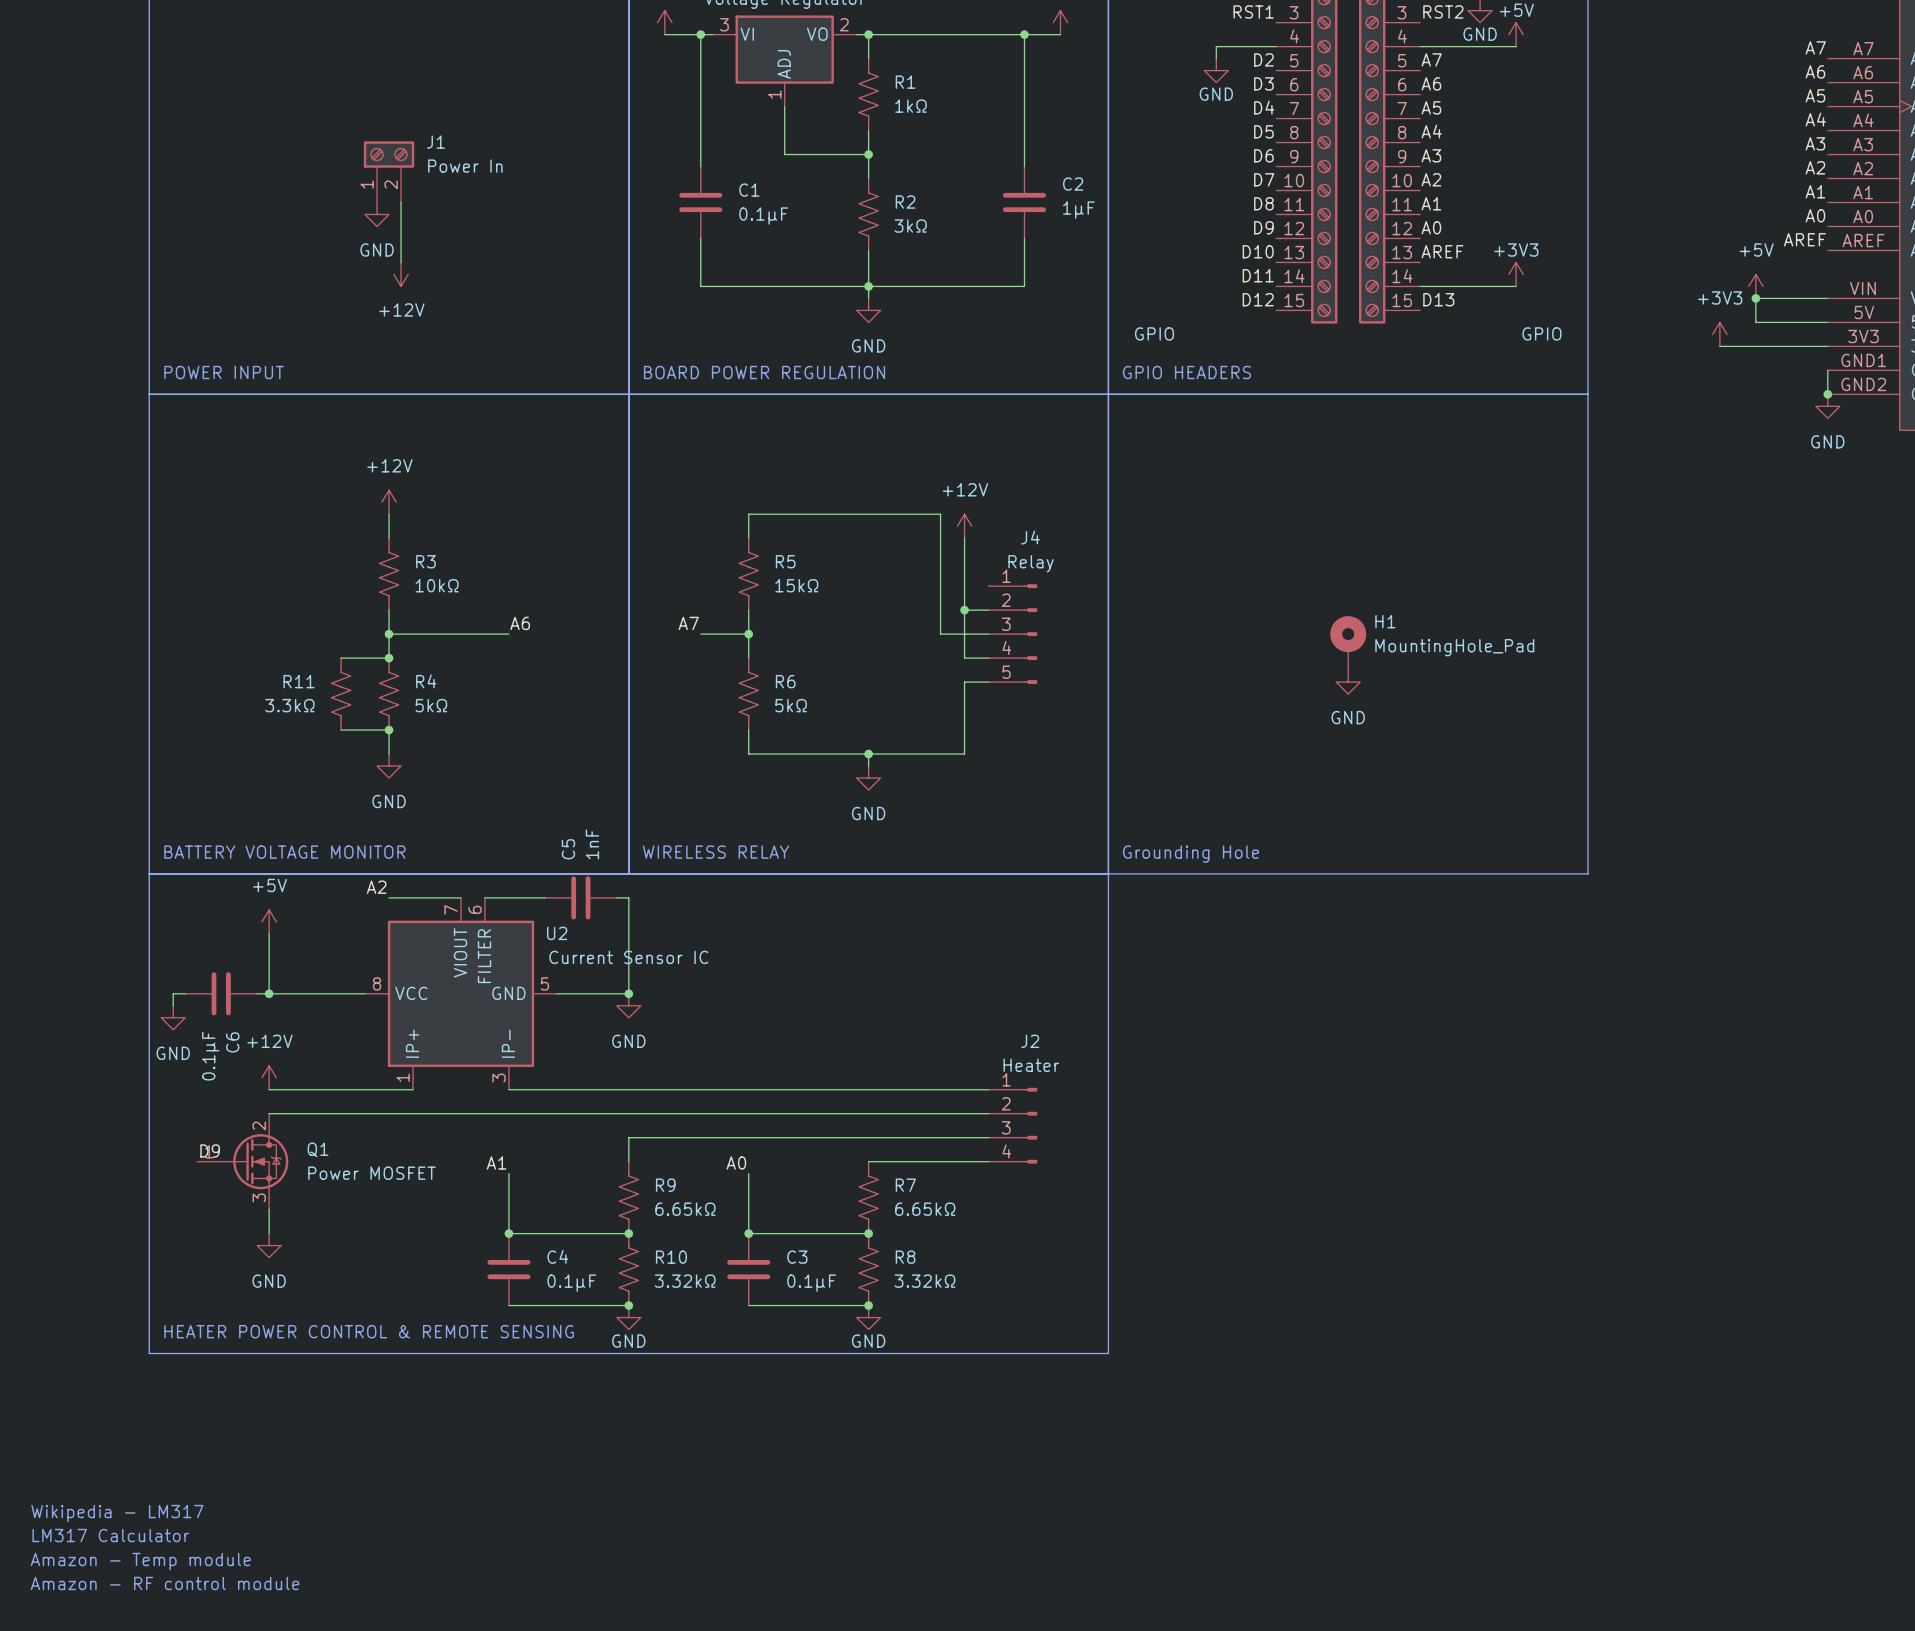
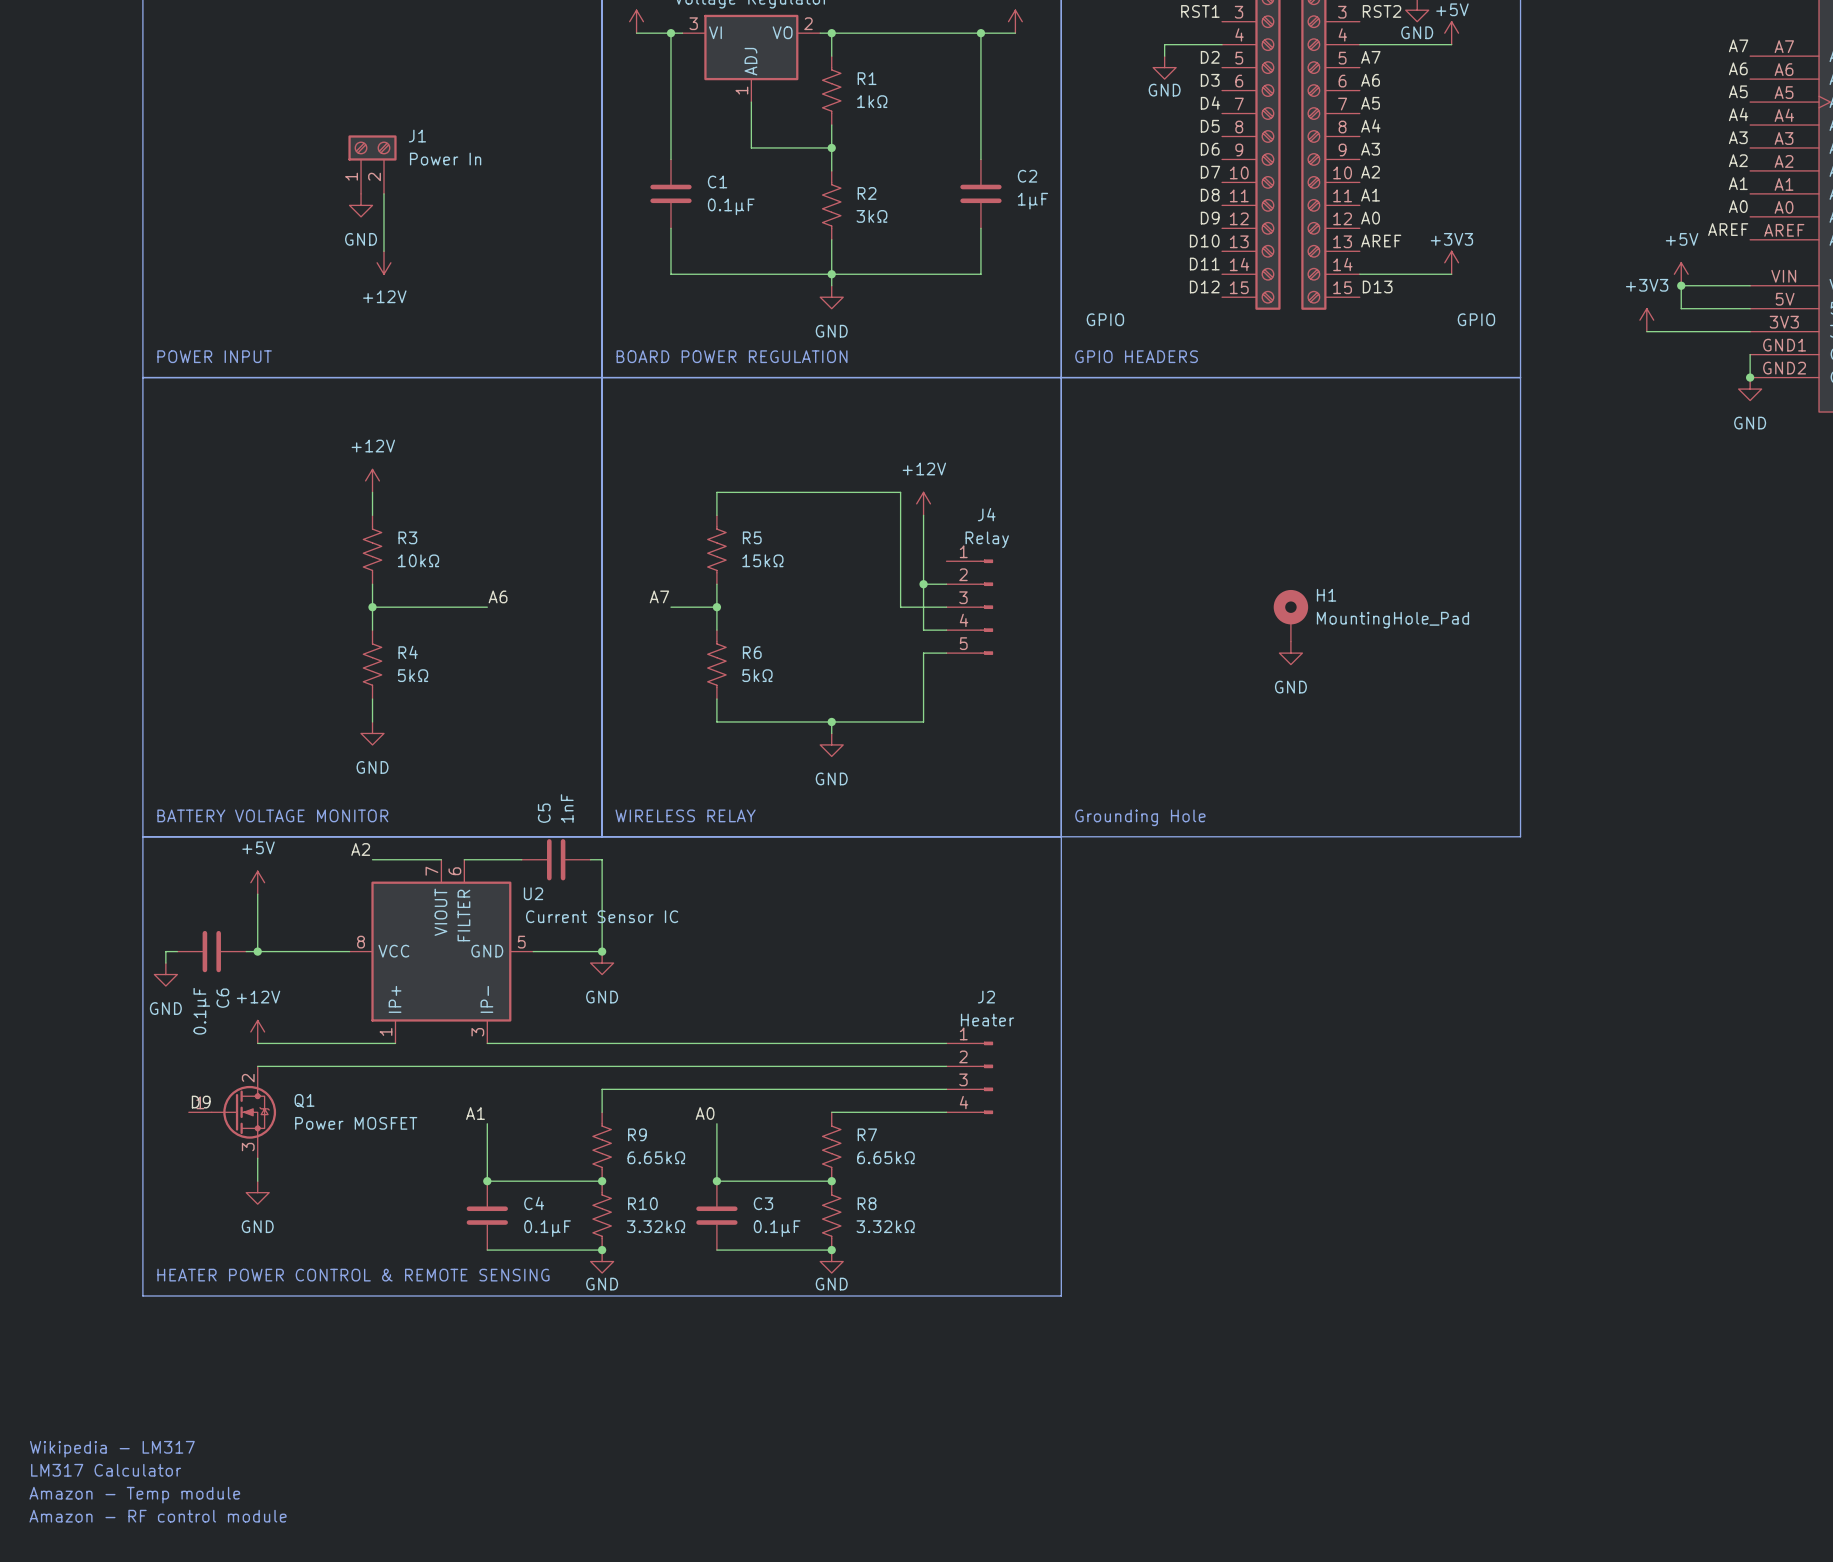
wire: (341, 658) (389, 658) -> none
junction: (389, 658) -> none
R11: 3.3kΩ (341, 694) -> none
wire: (341, 730) (389, 730) -> none
junction: (389, 730) -> none

